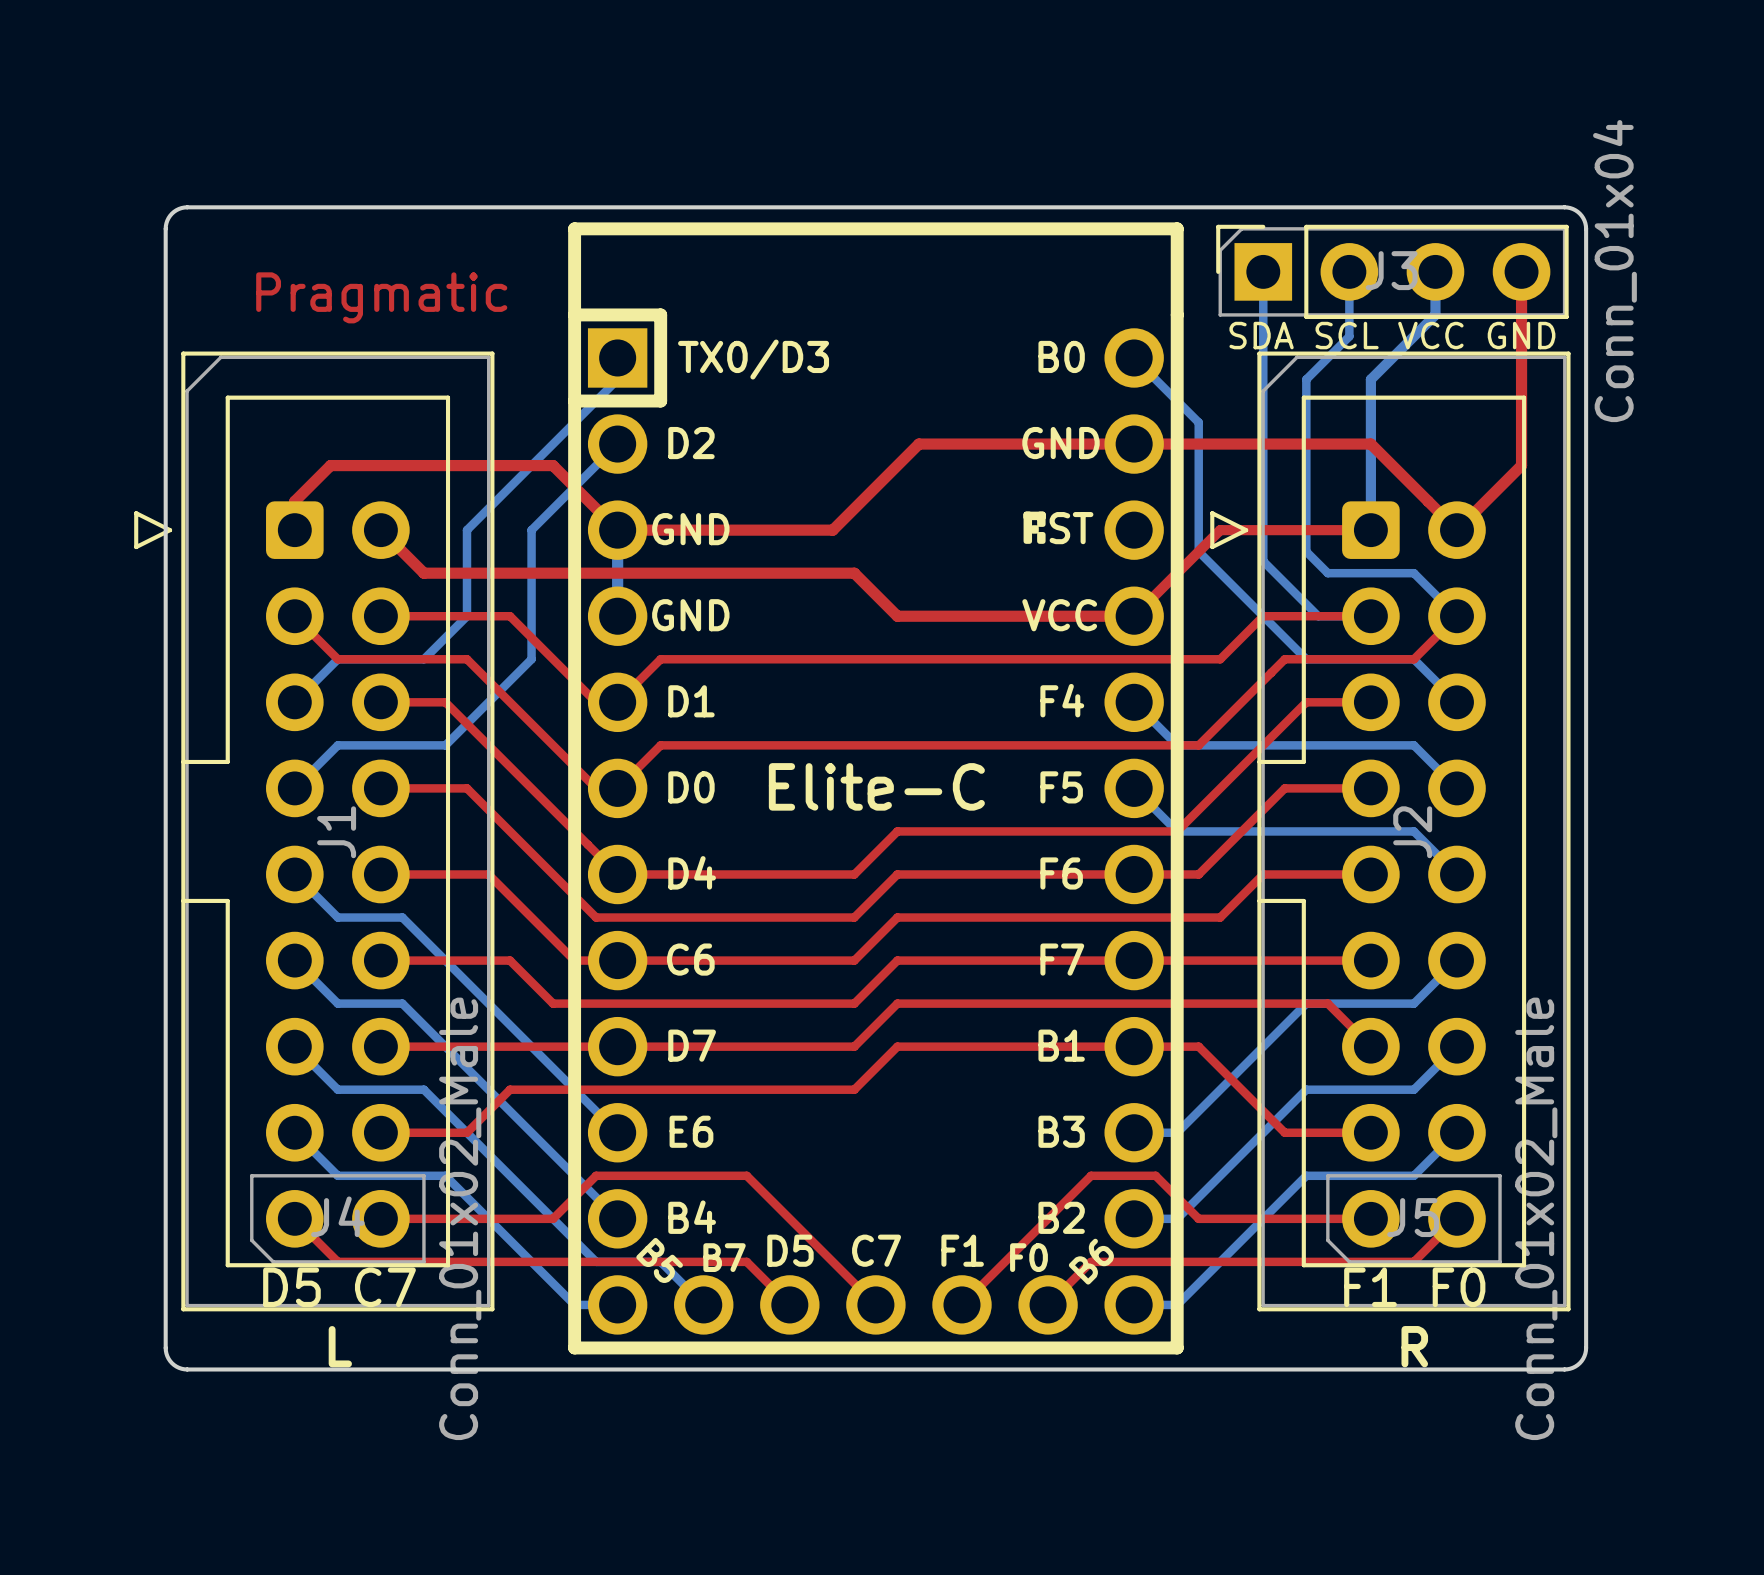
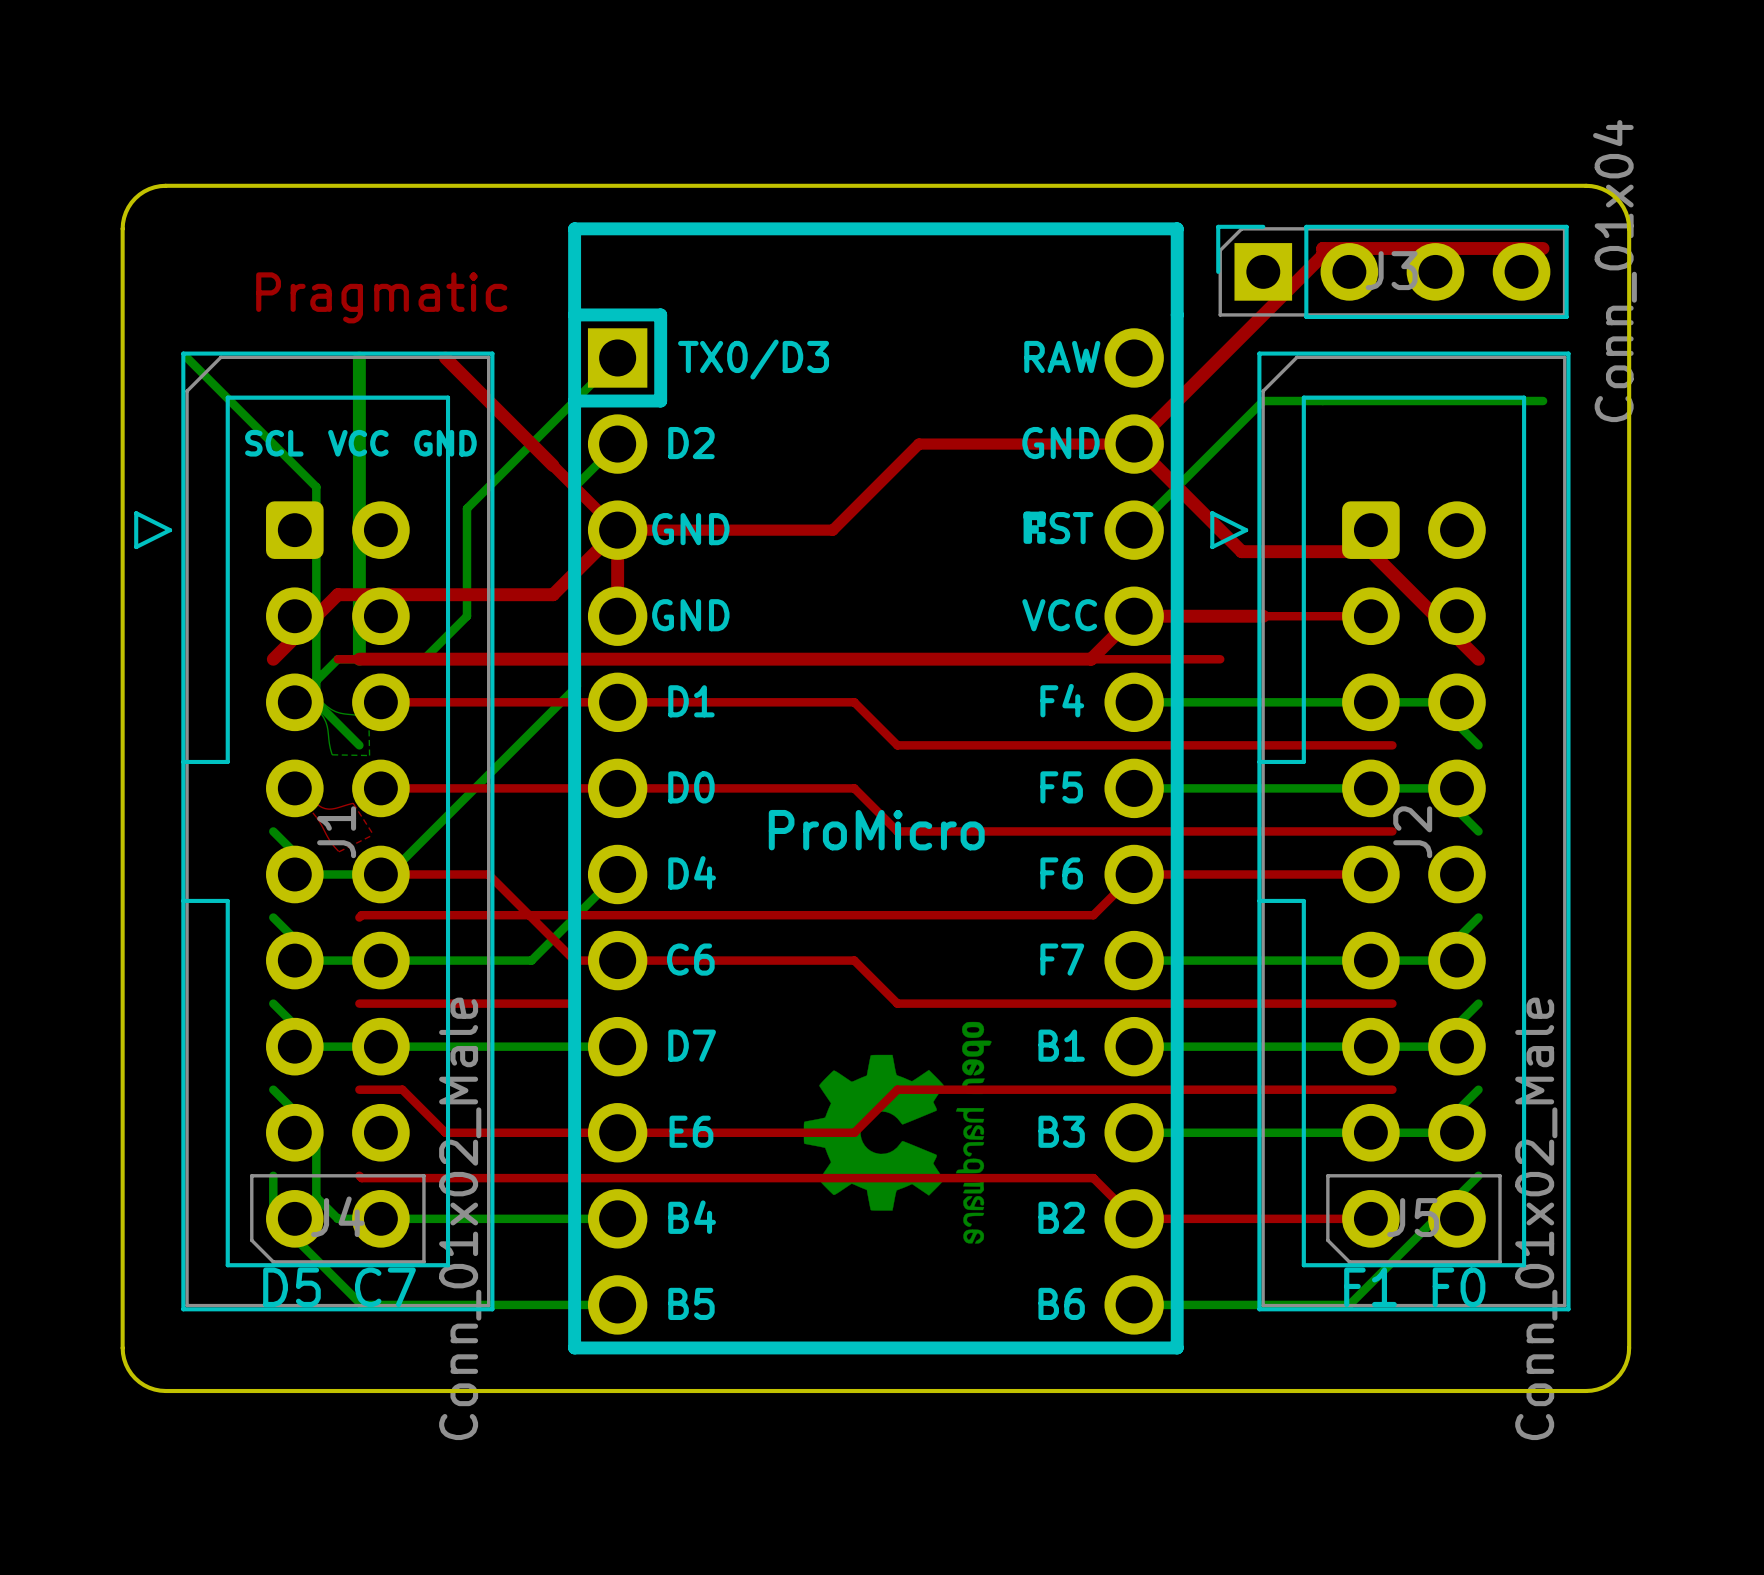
part footprint: [568, 222, 1184, 1355] -> [568, 222, 1184, 1355]
top track: none -> (1543, 248) (1322, 248) (1322, 255) (1134, 444) (1241, 551) (1370, 551) (1478, 659)
bottom track: (1263, 271) (1263, 561) (1318, 616) (1370, 616) -> none
bottom track: (1349, 271) (1349, 336) (1306, 379) (1306, 551) (1327, 573) (1413, 573) (1456, 616) -> none
bottom track: (1435, 271) (1435, 314) (1370, 379) (1370, 530) -> none
top track: (1521, 271) (1521, 465) (1456, 530) (1370, 444) (1134, 444) -> none
text: SDA SCL VCC GND (1392, 335) -> none
bottom track: none -> (187, 357) (316, 487) (316, 702) (359, 745)
bottom track: none -> (359, 357) (359, 659)
bottom track: (617, 357) (617, 379) (466, 530) -> (617, 357) (466, 508) (466, 530)
bottom track: (1134, 357) (1198, 422) (1198, 551) (1306, 659) (1413, 659) (1456, 702) -> none
bottom track: none -> (1543, 401) (1263, 401) (1134, 530)
text: none -> SCL (274, 443)
text: none -> VCC (358, 443)
text: none -> GND (445, 443)
top track: (553, 465) (330, 465) (294, 501) (294, 530) -> (553, 465) (445, 357)
bottom track: (576, 484) (531, 530) (531, 659) (445, 745) (337, 745) (294, 788) -> (576, 484) (576, 686) (388, 874) (316, 874) (273, 831)
top track: (380, 530) (423, 573) (854, 573) (897, 616) (1134, 616) (1220, 530) (1370, 530) -> none
top track: (294, 616) (337, 659) -> none
top track: (380, 616) (510, 616) (596, 702) -> (445, 702) (596, 702)
top track: none -> (617, 616) (617, 530) (553, 594) (337, 594) (273, 659)
top track: (1263, 616) (1220, 659) -> (1263, 616) (1134, 616) (1091, 659) (359, 659)
top track: (1456, 616) (1413, 659) (1284, 659) (1198, 745) -> (1392, 745) (1198, 745)
top track: (466, 659) (596, 788) -> (466, 788) (596, 788)
top track: (660, 659) (617, 702) -> none
bottom zone outline: none -> (321, 701) (335, 711) (368, 718) (369, 755) (332, 754) (325, 721) (315, 707) (321, 701)
top track: (445, 702) (617, 874) (854, 874) (897, 831) -> (617, 788) (854, 788) (897, 831)
bottom track: (1134, 702) (1177, 745) (1413, 745) (1456, 788) -> (1134, 702) (1435, 702) (1478, 745)
top track: (1370, 702) (1306, 702) (1177, 831) -> (1392, 831) (1177, 831)
top track: (897, 745) (660, 745) (617, 788) -> (897, 745) (854, 702) (617, 702)
part value: Elite-C (876, 786) -> ProMicro (876, 830)
top track: (466, 788) (596, 917) (854, 917) (897, 874) (1134, 874) -> (359, 917) (361, 915) (1093, 915) (1134, 874)
bottom track: (1134, 788) (1177, 831) (1413, 831) (1456, 874) -> (1134, 788) (1435, 788) (1478, 831)
top track: (1370, 788) (1284, 788) (1198, 874) -> (1263, 874) (1198, 874)
top zone outline: none -> (313, 801) (321, 807) (328, 809) (353, 803) (373, 834) (339, 851) (307, 807) (313, 801)
bottom track: (294, 874) (337, 917) (402, 917) (617, 1132) -> none
bottom track: none -> (617, 874) (531, 960) (316, 960) (273, 917)
top track: (1263, 874) (1220, 917) (897, 917) (854, 960) -> (897, 1003) (854, 960)
bottom track: none -> (1478, 917) (1435, 960) (1134, 960)
bottom track: (294, 960) (337, 1003) (402, 1003) (617, 1218) -> (273, 1089) (316, 1132) (316, 1197) (337, 1218) (617, 1218)
top track: (380, 960) (510, 960) (553, 1003) -> (359, 1003) (553, 1003)
top track: (1370, 960) (897, 960) (854, 1003) (574, 1003) -> none
bottom track: (1456, 960) (1413, 1003) (1306, 1003) (1177, 1132) -> (1478, 1089) (1435, 1132) (1177, 1132)
bottom track: none -> (273, 1003) (316, 1046) (617, 1046)
top track: (897, 1003) (854, 1046) (380, 1046) -> none
top track: (1327, 1003) (1370, 1046) -> (1327, 1003) (1392, 1003)
bottom track: none -> (1478, 1003) (1435, 1046) (1134, 1046)
drawing: none -> [803, 1021, 992, 1244]
bottom track: (294, 1046) (337, 1089) (423, 1089) (596, 1261) (660, 1261) (703, 1304) -> none
bottom track: (1456, 1046) (1413, 1089) (1306, 1089) (1177, 1218) (1134, 1218) -> none
bottom track: (294, 1132) (337, 1175) (445, 1175) (574, 1304) -> (273, 1175) (273, 1216) (361, 1304) (574, 1304)
top track: (380, 1132) (445, 1132) -> (359, 1089) (402, 1089) (445, 1132)
top track: (466, 1132) (510, 1089) (854, 1089) (897, 1046) (1198, 1046) (1284, 1132) (1370, 1132) -> (466, 1132) (854, 1132) (897, 1089) (1392, 1089)
bottom track: (1456, 1132) (1413, 1175) (1306, 1175) (1177, 1304) -> (1478, 1175) (1349, 1304) (1177, 1304)
top track: (294, 1218) (337, 1261) (746, 1261) (789, 1304) -> none
top track: (380, 1218) (553, 1218) (596, 1175) (746, 1175) (875, 1304) -> none
top track: (1198, 1218) (1155, 1175) (1091, 1175) (961, 1304) -> (1198, 1218) (1134, 1218) (1093, 1178) (361, 1178) (359, 1175)
top track: (1456, 1218) (1413, 1261) (1091, 1261) (1048, 1304) -> none
text: L (340, 1346) -> none
text: R (1414, 1346) -> none
board edge: (187, 1369) (178, 1367) (172, 1363) (167, 1356) (165, 1347) (165, 228) (167, 220) (174, 211) (187, 207) (1564, 207) (1575, 210) (1581, 215) (1586, 228) (1586, 1347) (1584, 1356) (1577, 1365) (1564, 1369) (187, 1369) -> (122, 228) (122, 1347) (128, 1369) (139, 1382) (149, 1387) (165, 1391) (1586, 1391) (1607, 1385) (1620, 1374) (1625, 1364) (1629, 1347) (1629, 228) (1625, 212) (1612, 194) (1597, 187) (1586, 185) (165, 185) (149, 189) (135, 198) (125, 212) (122, 228)

